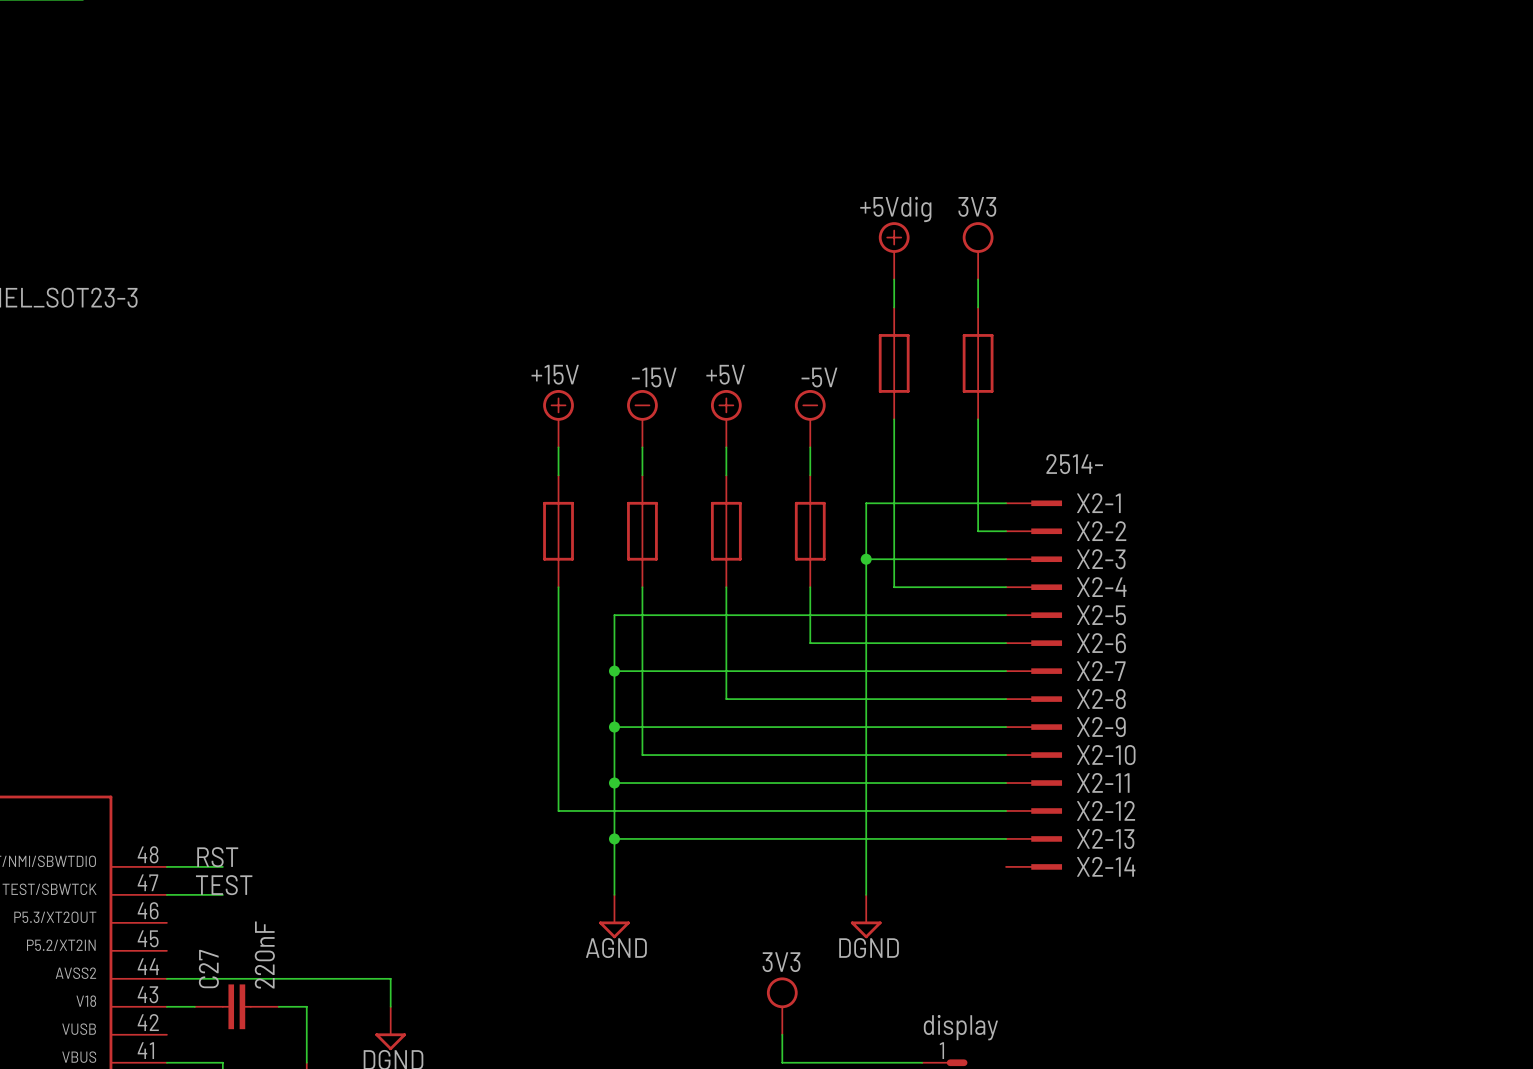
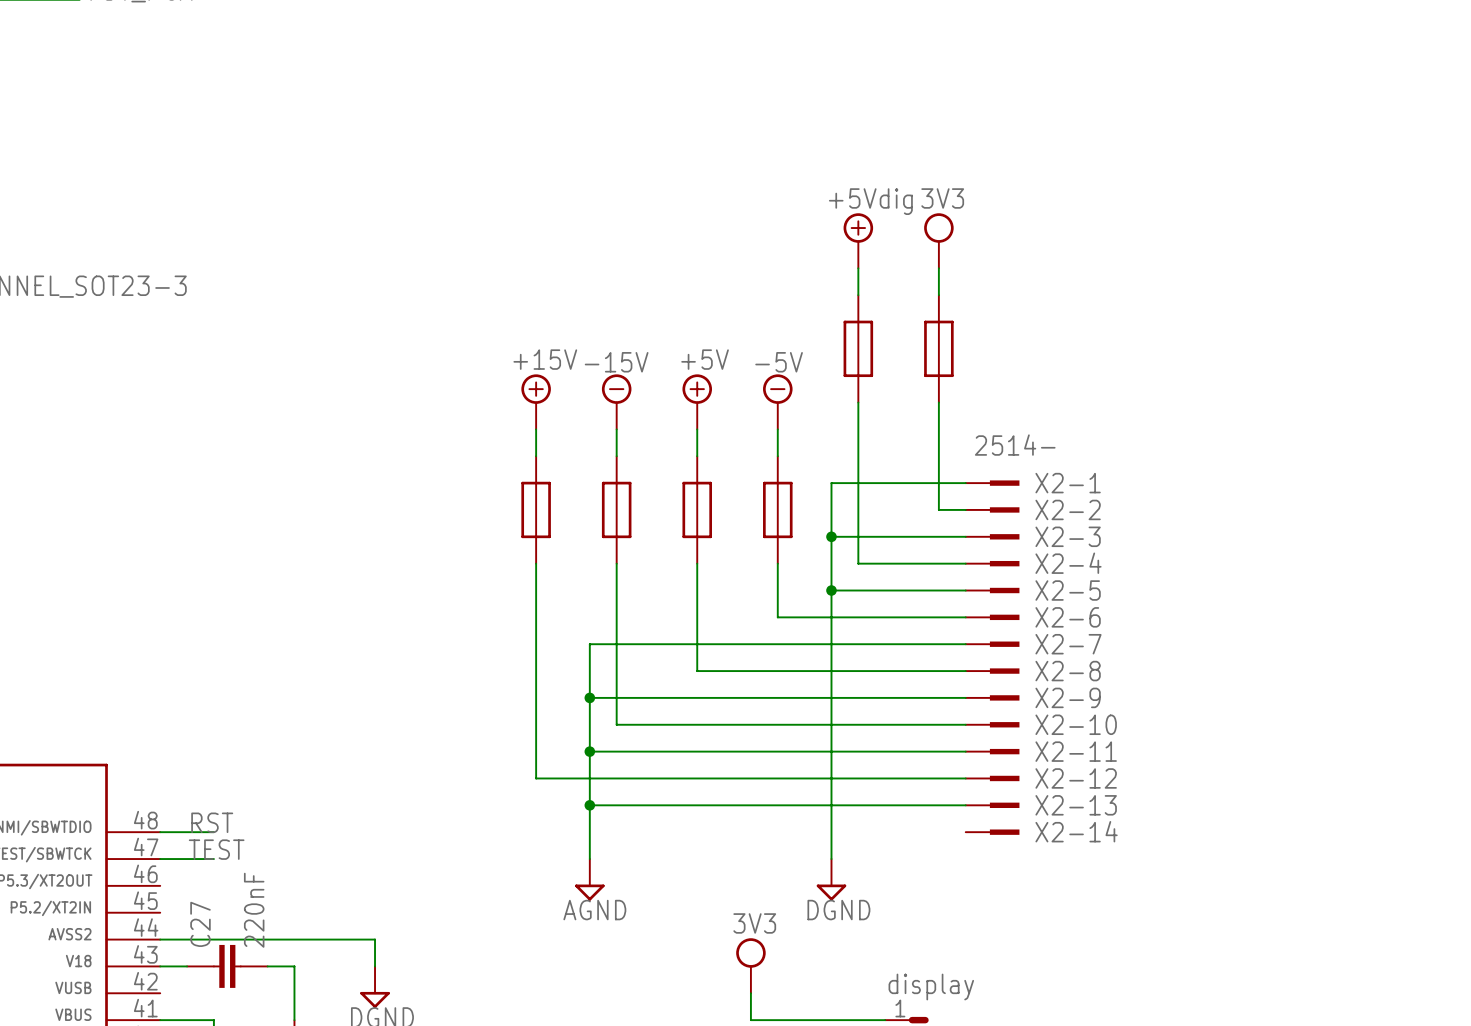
wire: (866, 615) (614, 615) (614, 671) -> none
junction: none -> (831, 590)
junction: (614, 671) -> none

